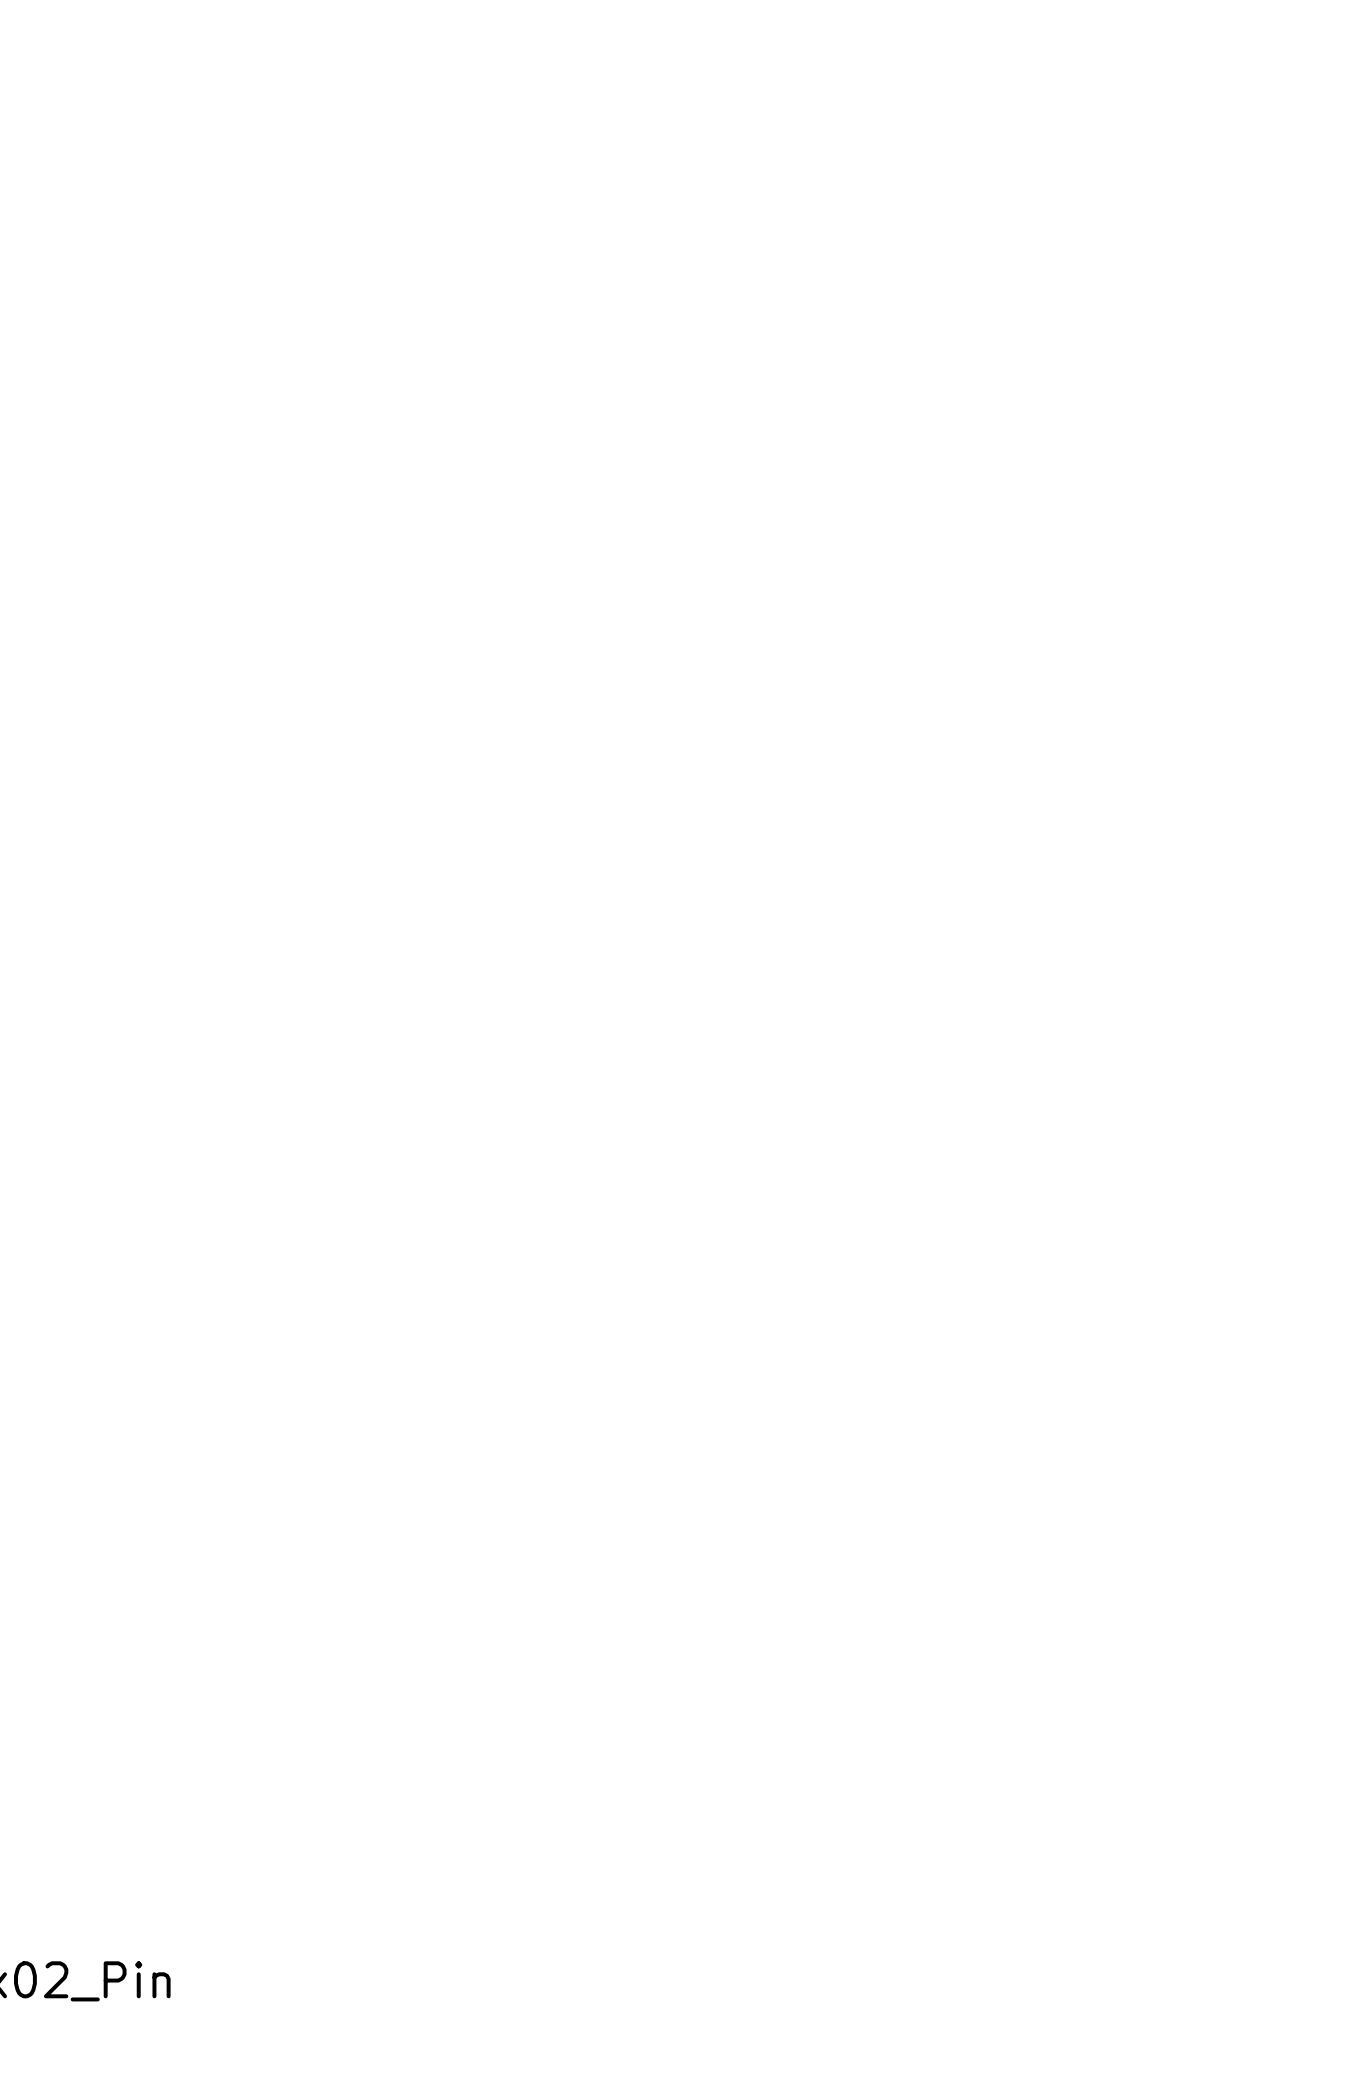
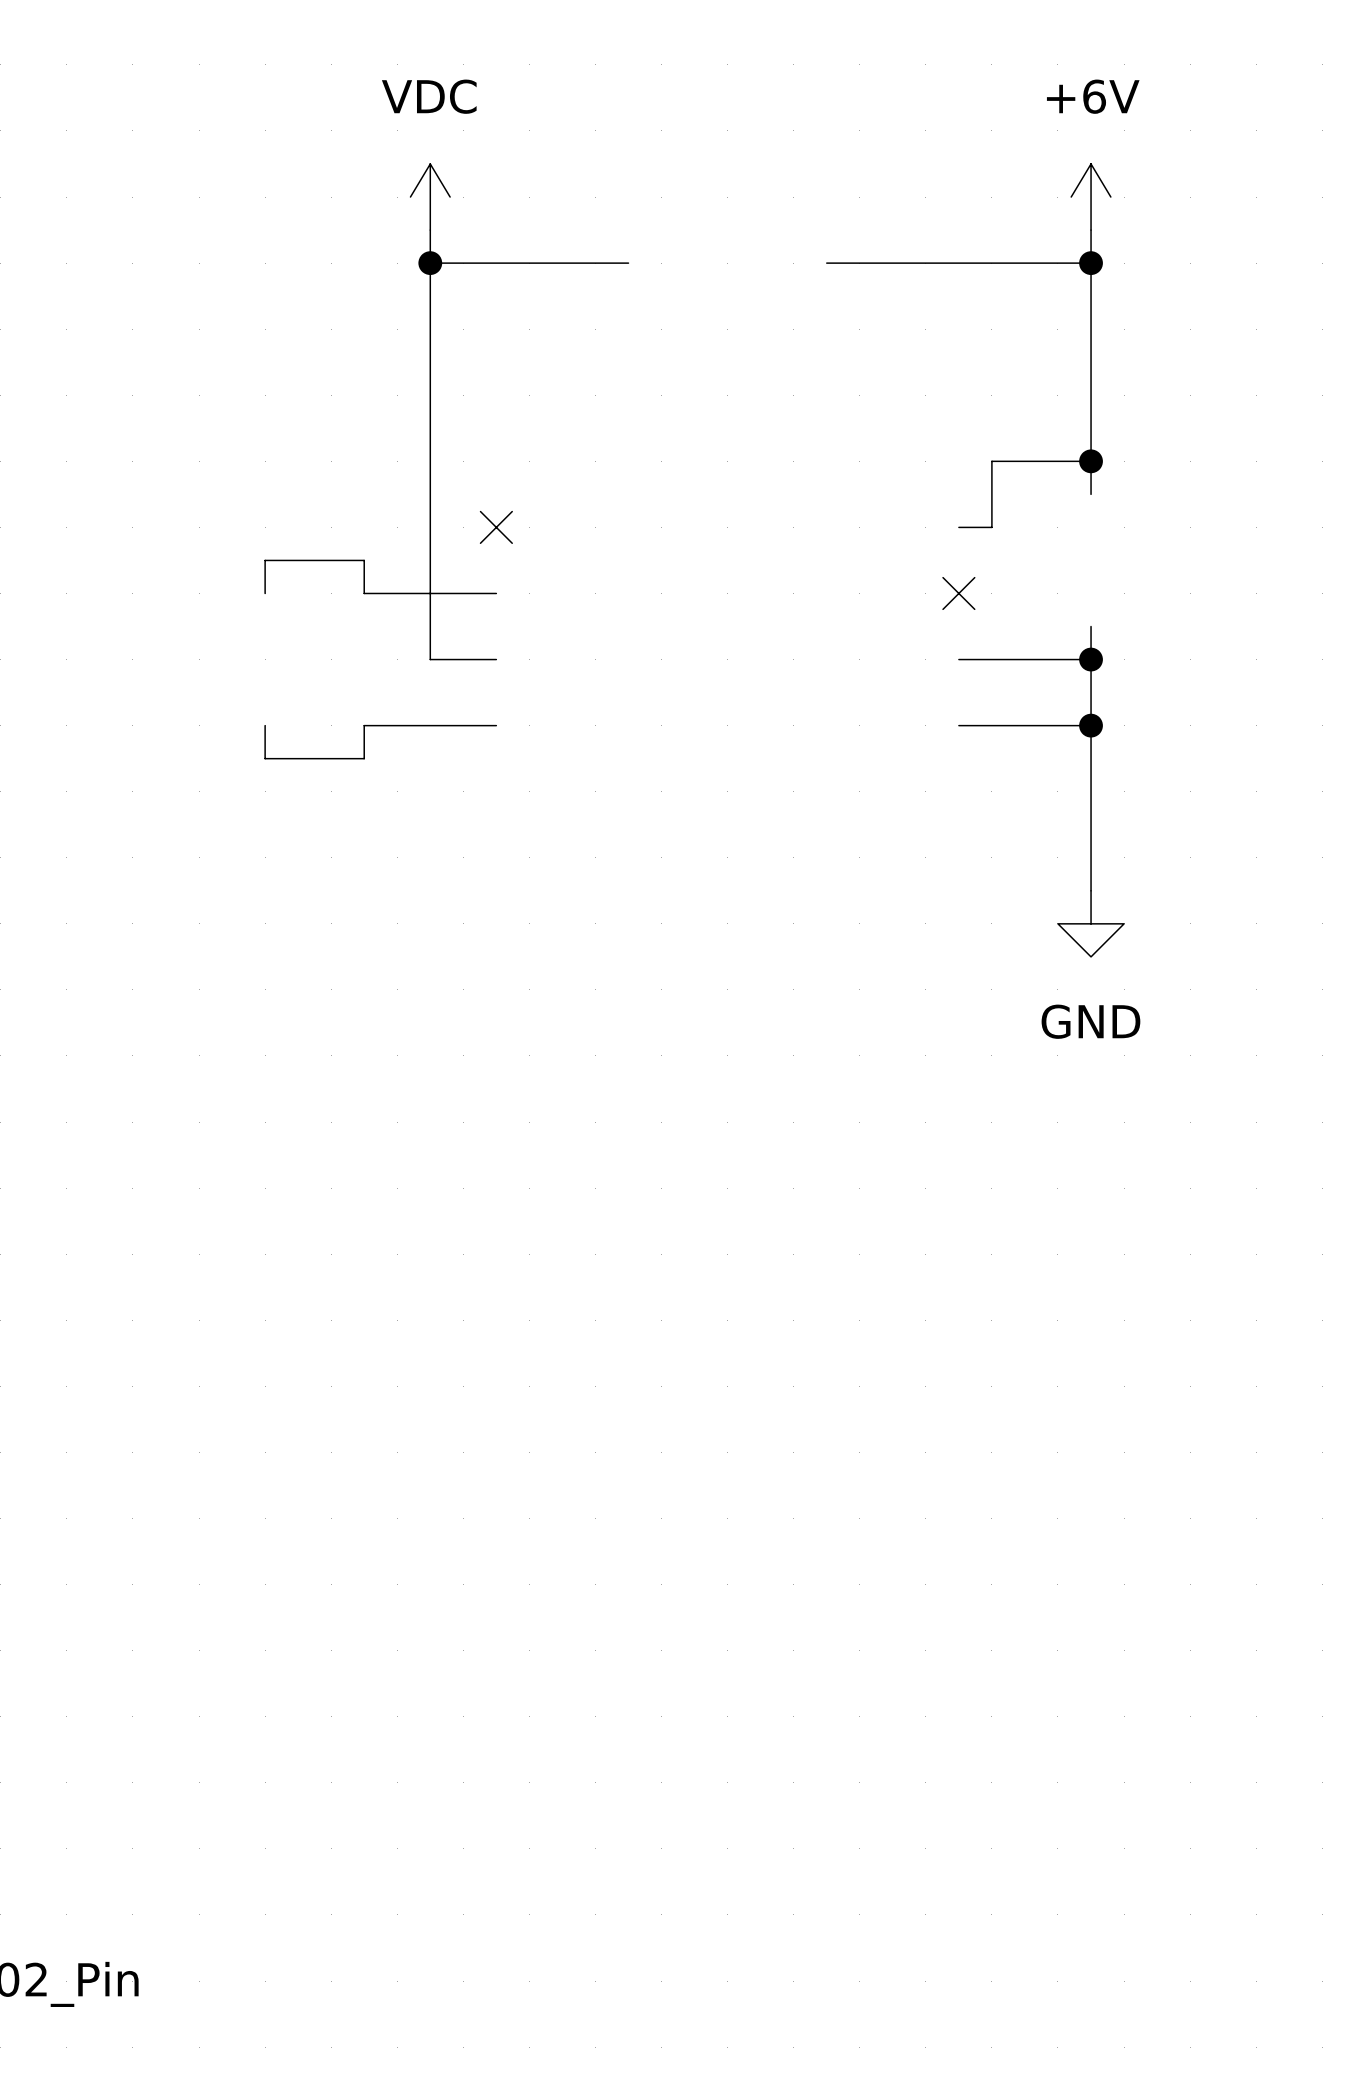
power symbol: none -> VDC (430, 197)
power symbol: none -> +6V (1091, 197)
wire: none -> (430, 230) (430, 659) (496, 659)
wire: none -> (1091, 230) (1091, 494)
wire: none -> (430, 263) (628, 263)
junction: none -> (430, 263)
wire: none -> (826, 263) (1091, 263)
junction: none -> (1091, 263)
wire: none -> (1091, 461) (991, 461) (991, 527) (958, 527)
junction: none -> (1091, 461)
no-connect mark: none -> (496, 527)
wire: none -> (265, 593) (265, 560) (364, 560) (364, 593) (496, 593)
no-connect mark: none -> (958, 593)
wire: none -> (1091, 626) (1091, 890)
wire: none -> (958, 659) (1091, 659)
junction: none -> (1091, 659)
wire: none -> (265, 725) (265, 758) (364, 758) (364, 725) (496, 725)
wire: none -> (958, 725) (1091, 725)
junction: none -> (1091, 725)
power symbol: none -> GND (1091, 923)

